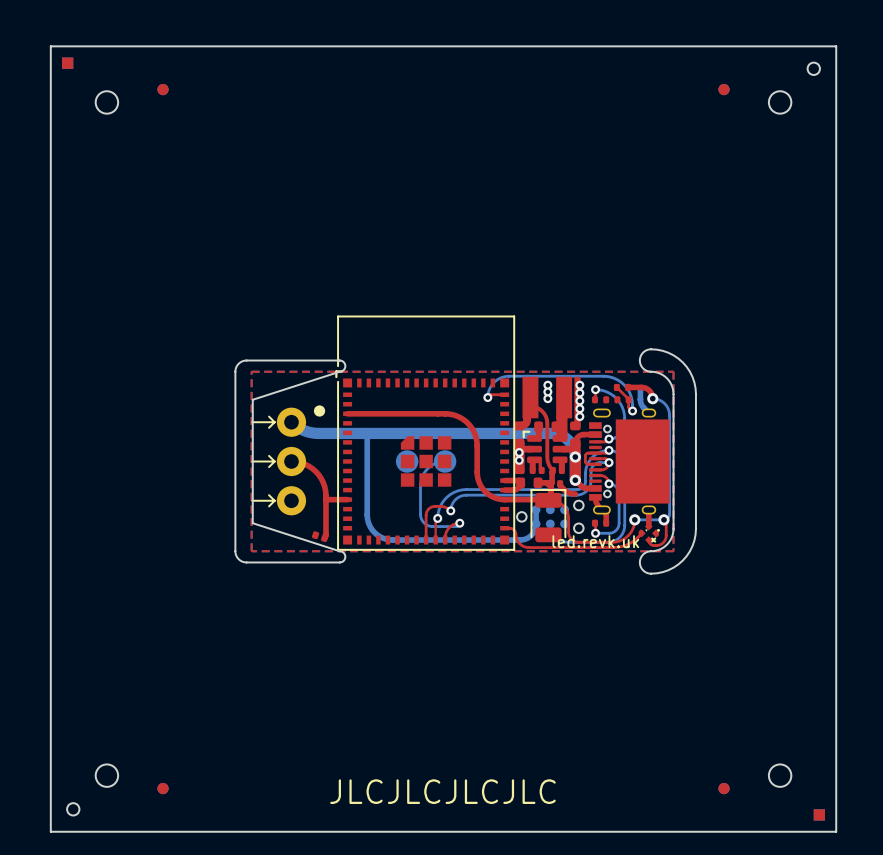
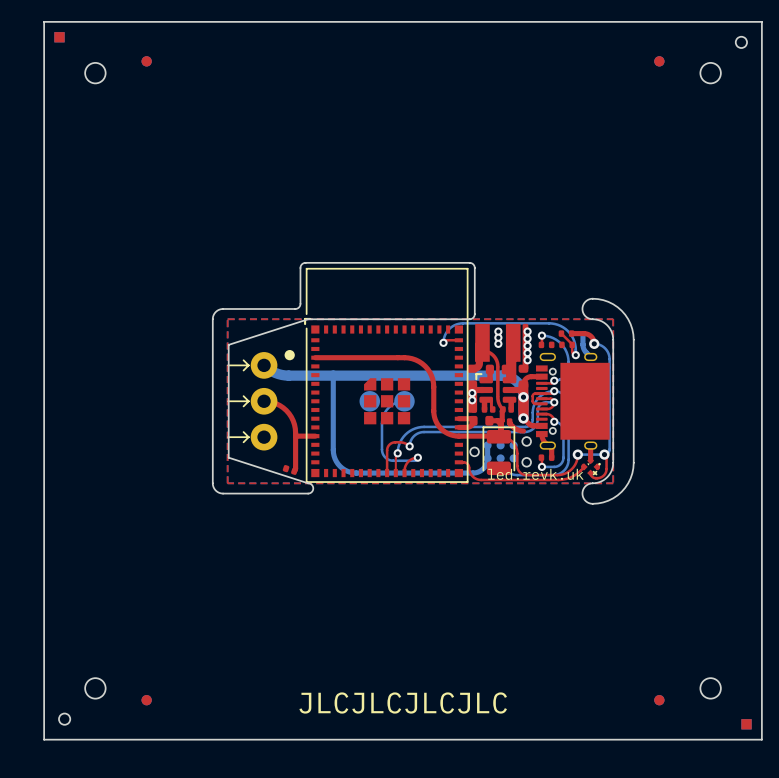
board edge: (325, 360) (343, 361) (344, 368) (339, 371) -> (295, 308) (300, 304) (300, 267) (304, 263) (469, 262) (474, 266) (474, 314) (470, 319) (308, 319)

